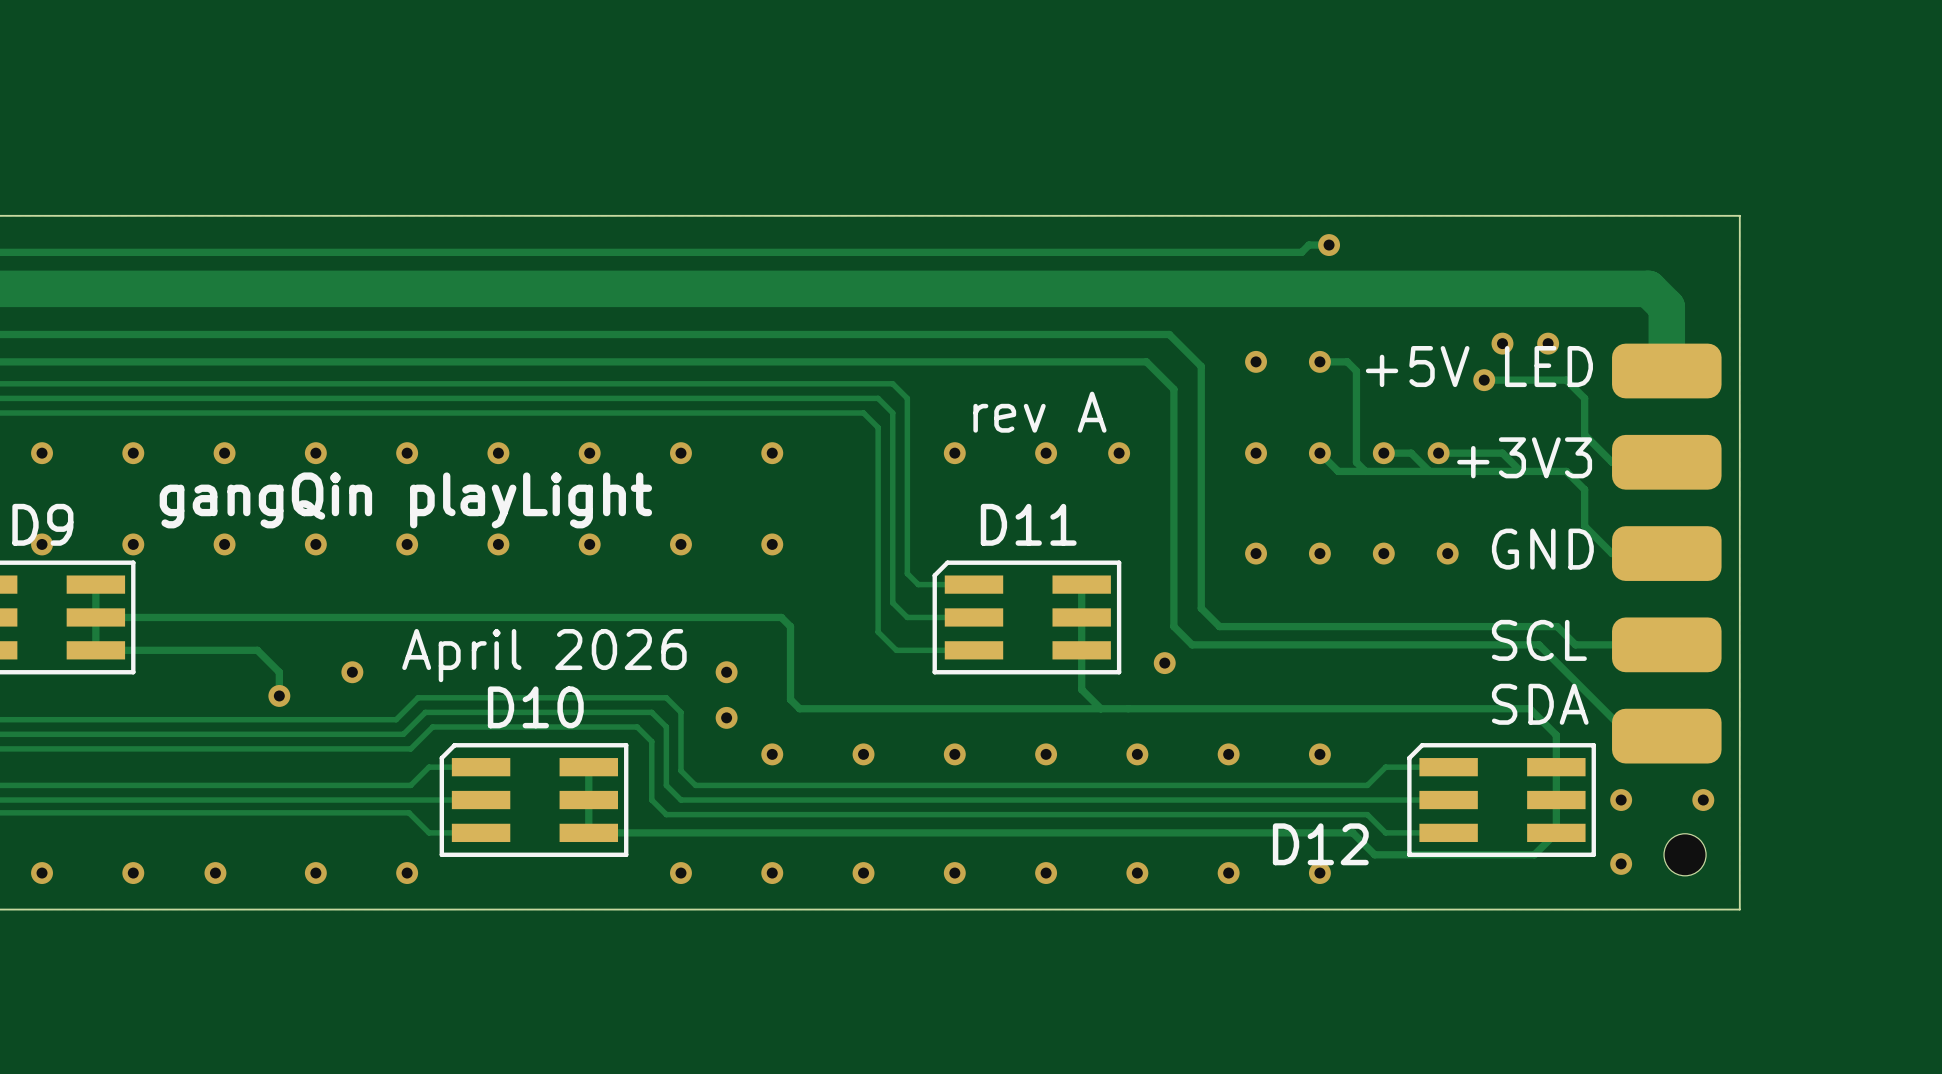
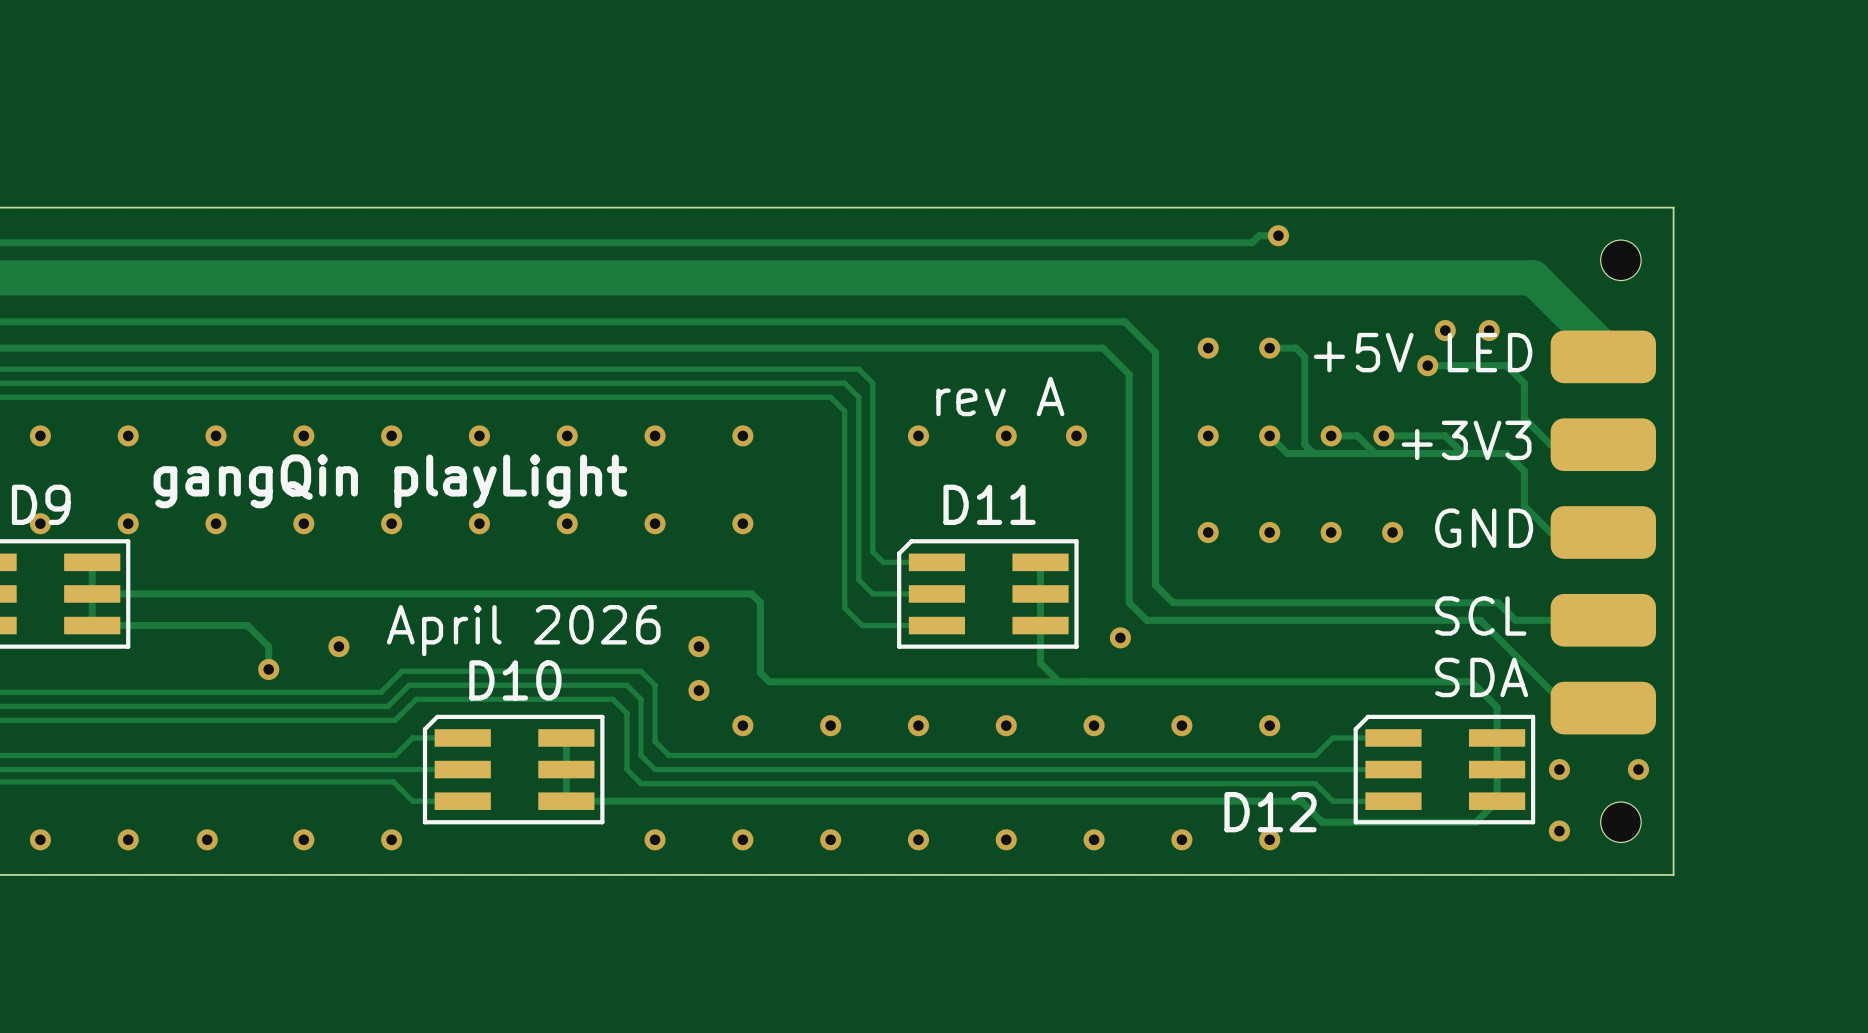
part: none -> (1620, 260)
track: (1593, 288) (1648, 288) (1666, 307) (1666, 361) -> (1533, 277) (1603, 348)

